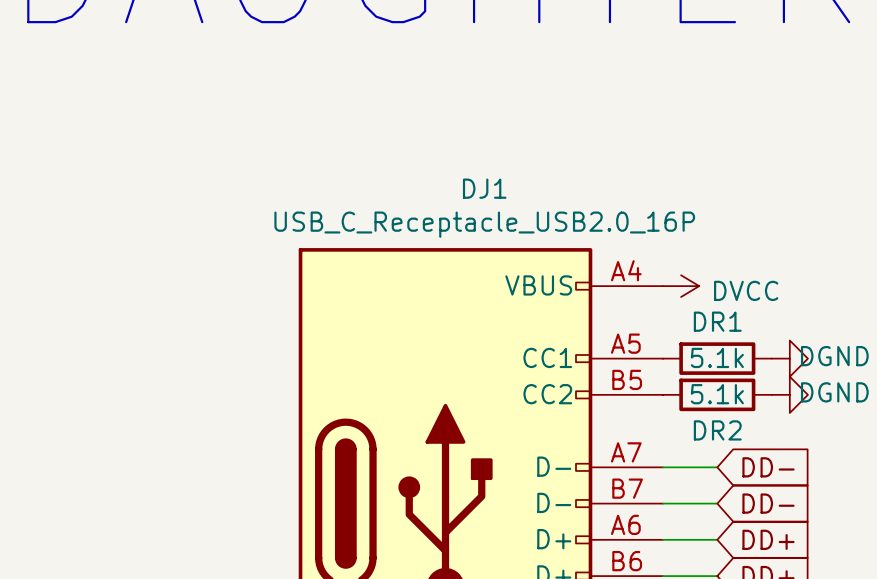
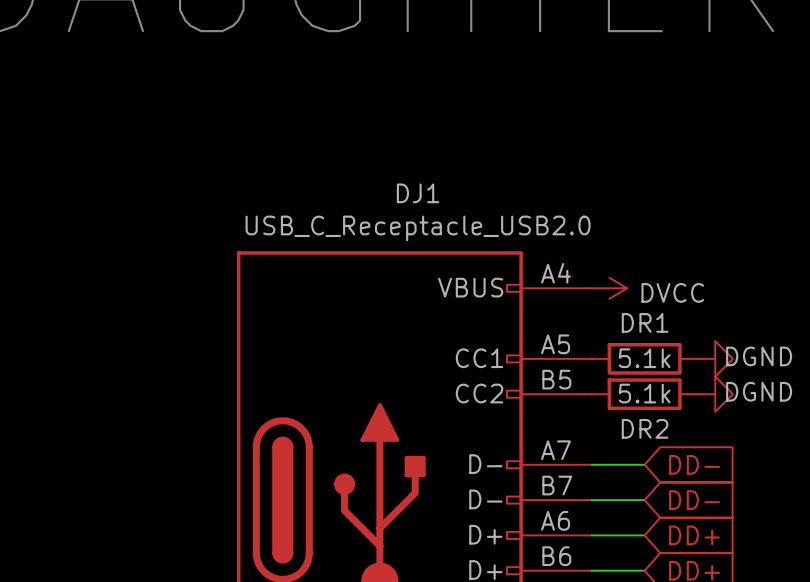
DJ1 value: USB_C_Receptacle_USB2.0_16P (484, 224) -> USB_C_Receptacle_USB2.0 (418, 228)

